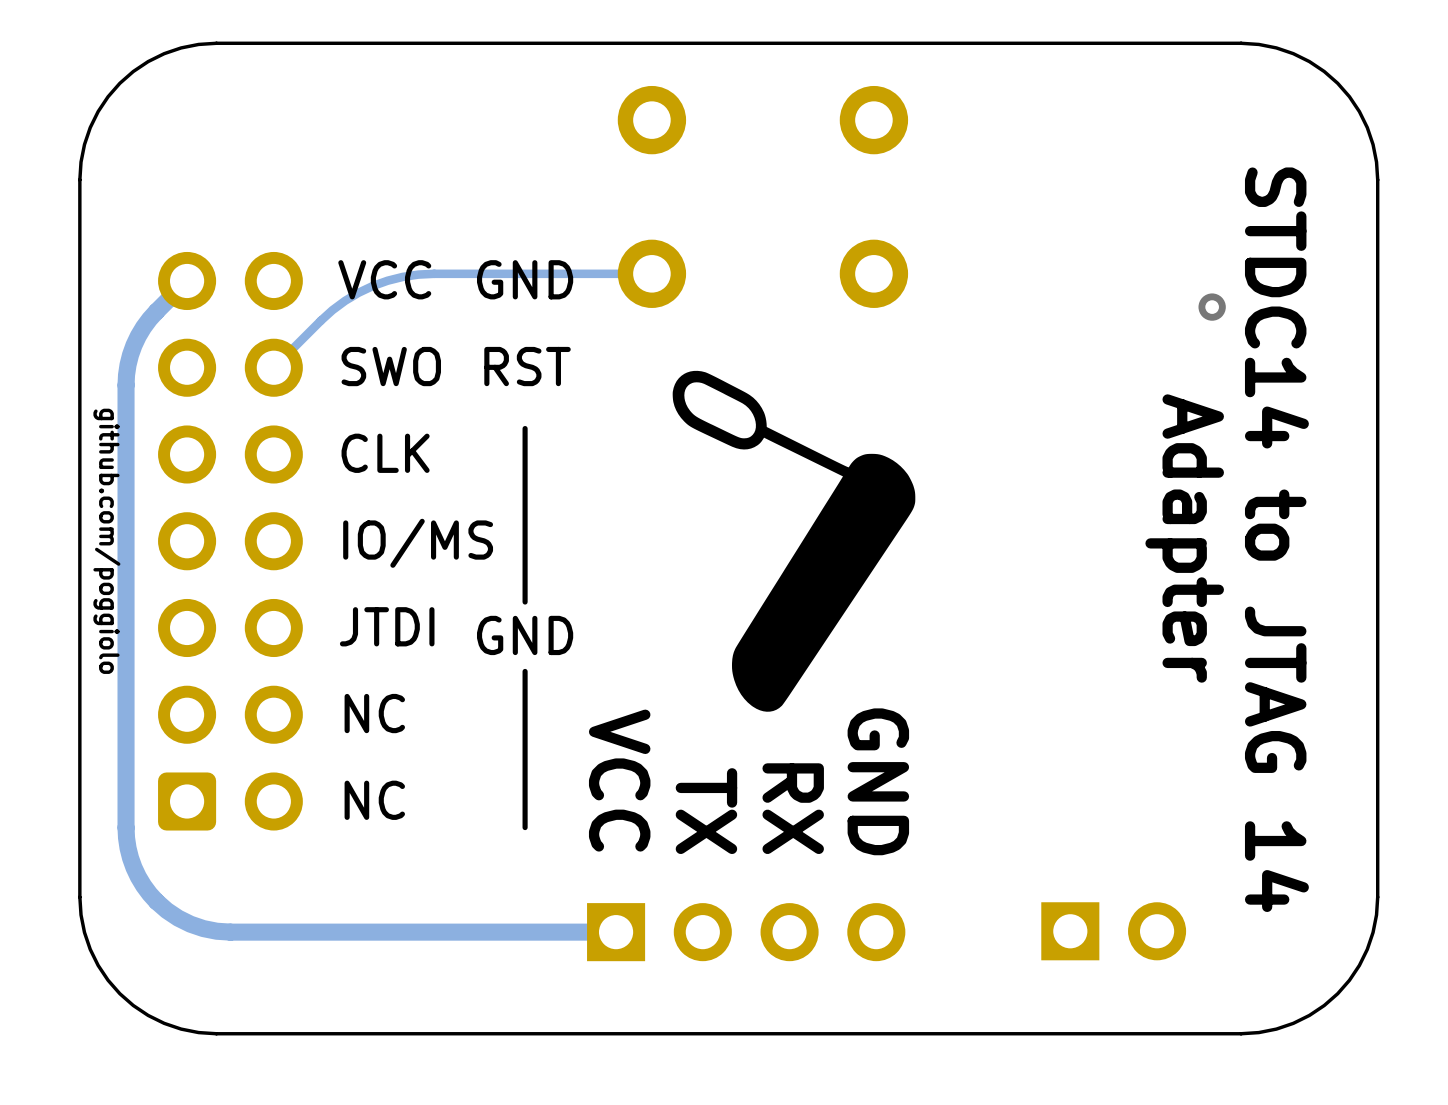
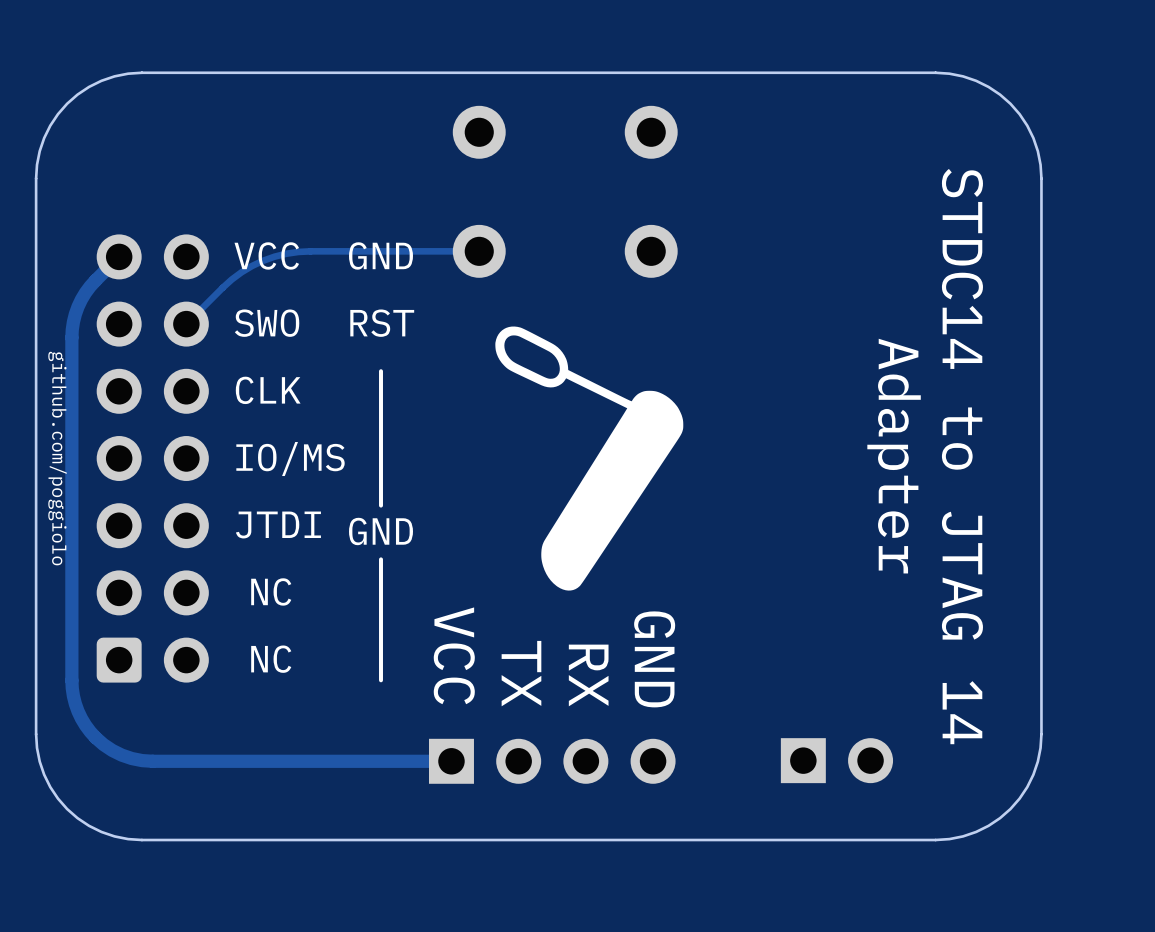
via: (1212, 307) -> none

